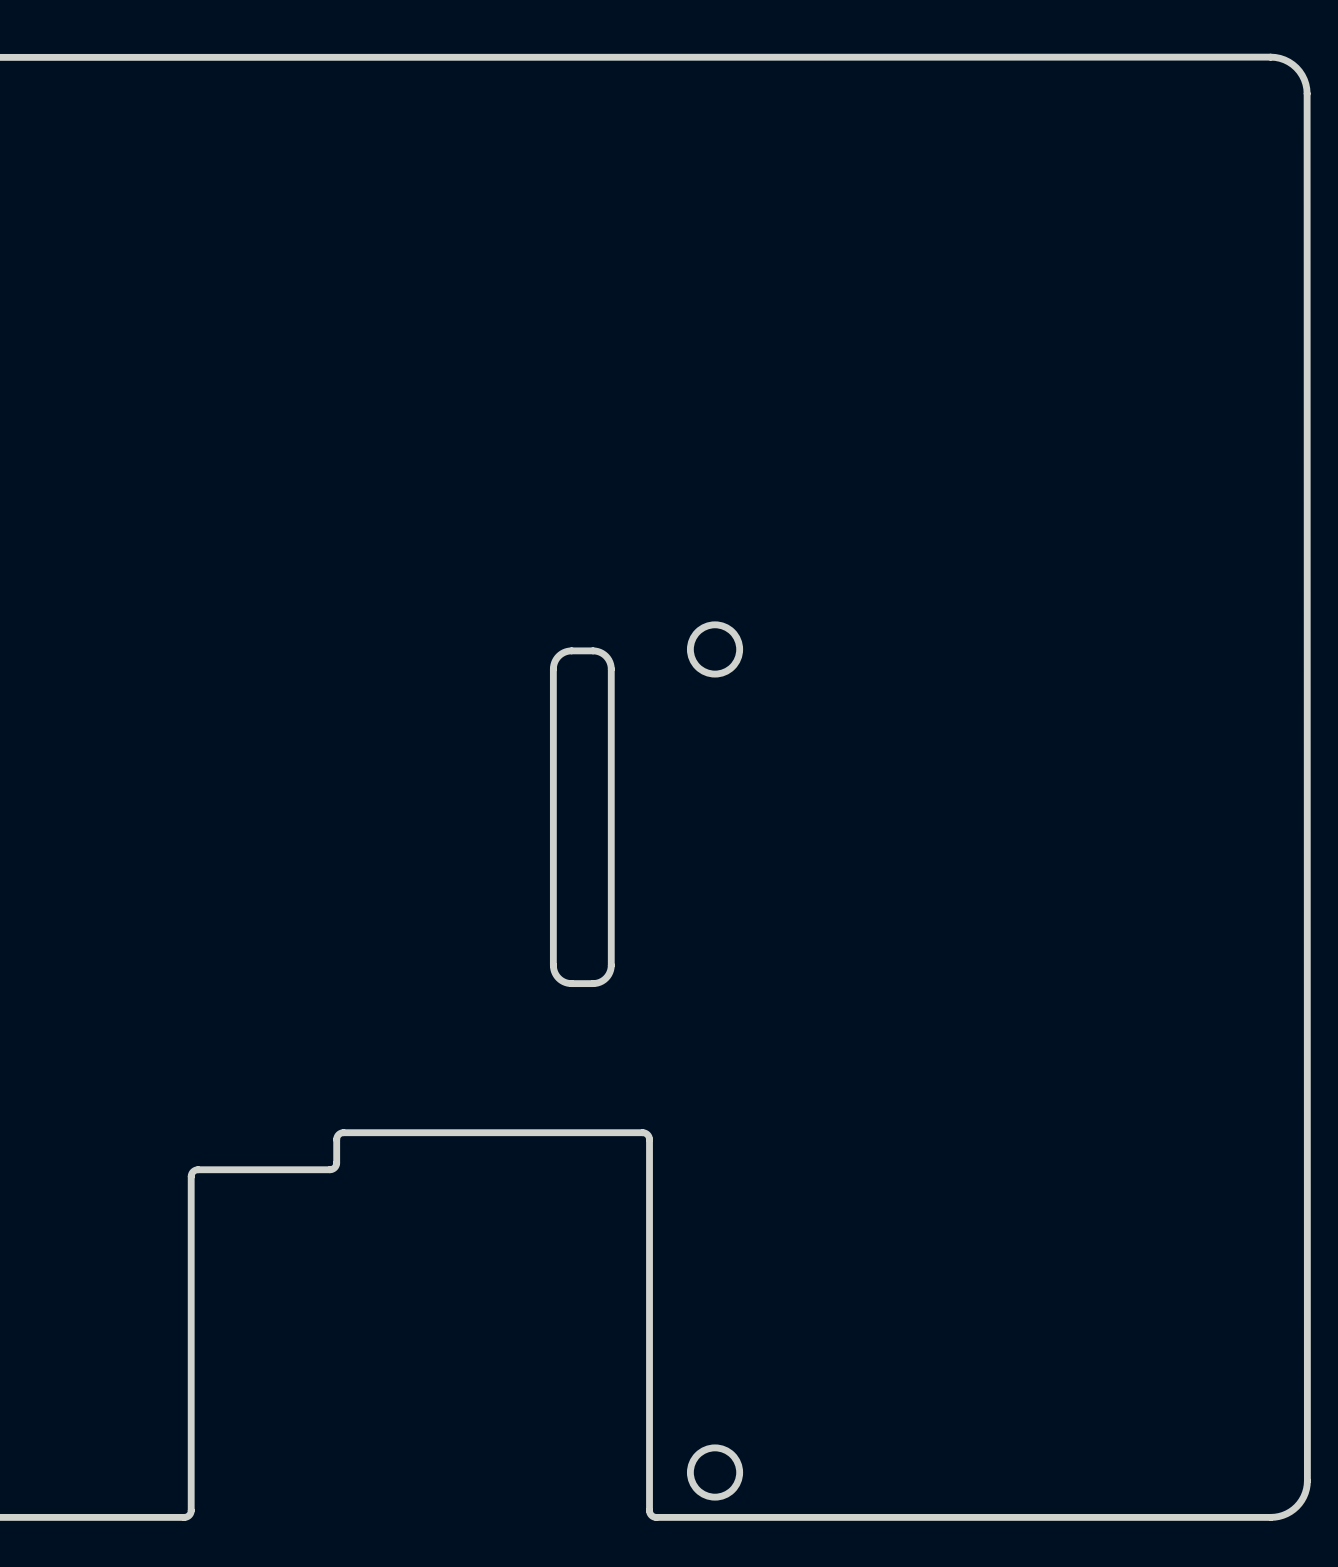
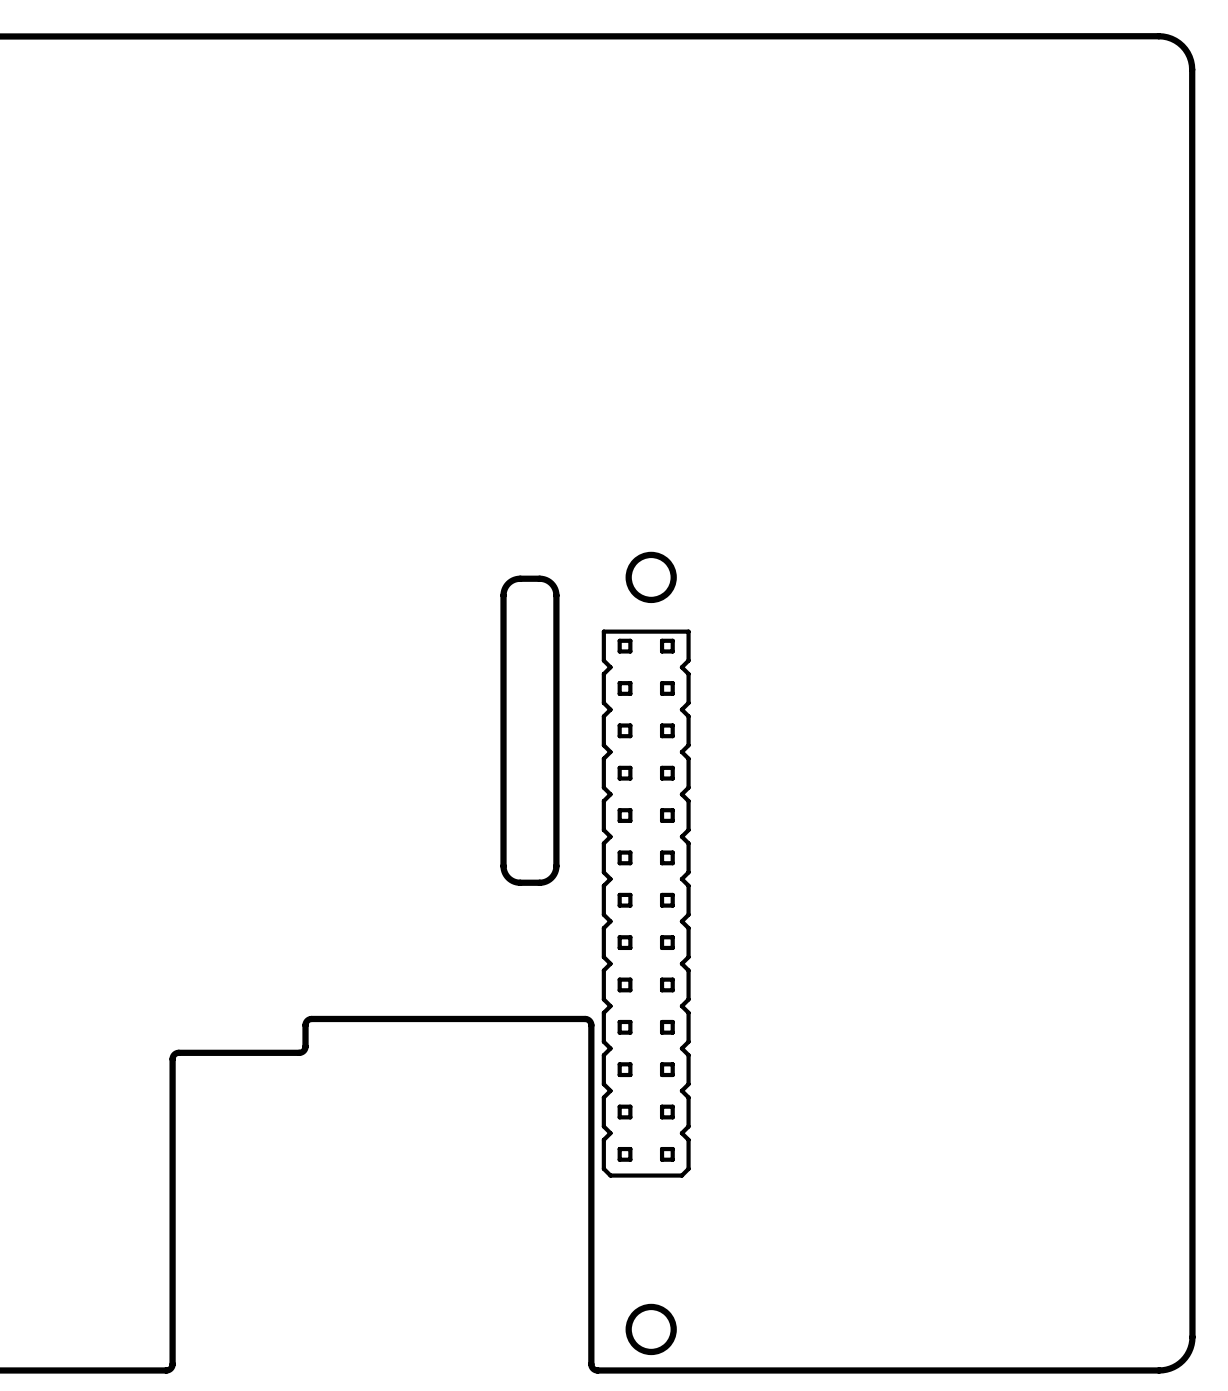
board edge: none -> (688, 631) (688, 660) (681, 667) (688, 673) (688, 702) (681, 709) (688, 716) (688, 745) (681, 752) (688, 758) (688, 787) (681, 794) (688, 801) (688, 830) (681, 836) (688, 843) (688, 872) (681, 879) (688, 885) (688, 914) (681, 921) (688, 928) (688, 957) (681, 963) (688, 970) (688, 999) (681, 1006) (688, 1012) (688, 1041) (681, 1048) (688, 1055) (688, 1084) (681, 1090) (688, 1097) (688, 1126) (681, 1133) (688, 1139) (688, 1168) (681, 1175) (610, 1175) (603, 1168) (603, 1139) (610, 1133) (603, 1126) (603, 1097) (610, 1090) (603, 1084) (603, 1055) (610, 1048) (603, 1041) (603, 1012) (610, 1006) (603, 999) (603, 970) (610, 963) (603, 957) (603, 928) (610, 921) (603, 914) (603, 885) (610, 879) (603, 872) (603, 843) (610, 836) (603, 830) (603, 801) (610, 794) (603, 787) (603, 758) (610, 752) (603, 745) (603, 716) (610, 709) (603, 702) (603, 673) (610, 667) (603, 660) (603, 631) (688, 631)
board edge: none -> (630, 640) (619, 640) (619, 651) (630, 651) (630, 640)
board edge: none -> (672, 640) (662, 640) (662, 651) (672, 651) (672, 640)
board edge: none -> (630, 683) (619, 683) (619, 693) (630, 693) (630, 683)
board edge: none -> (672, 683) (672, 693) (662, 693) (662, 683) (672, 683)
board edge: none -> (630, 725) (619, 725) (619, 736) (630, 736) (630, 725)
board edge: none -> (672, 725) (672, 736) (662, 736) (662, 725) (672, 725)
board edge: none -> (630, 767) (619, 767) (619, 778) (630, 778) (630, 767)
board edge: none -> (672, 767) (672, 778) (662, 778) (662, 767) (672, 767)
board edge: none -> (630, 810) (619, 810) (619, 820) (630, 820) (630, 810)
board edge: none -> (672, 810) (672, 820) (662, 820) (662, 810) (672, 810)
board edge: none -> (630, 852) (619, 852) (619, 863) (630, 863) (630, 852)
board edge: none -> (672, 852) (672, 863) (662, 863) (662, 852) (672, 852)
board edge: none -> (630, 894) (619, 894) (619, 905) (630, 905) (630, 894)
board edge: none -> (672, 894) (672, 905) (662, 905) (662, 894) (672, 894)
board edge: none -> (630, 937) (619, 937) (619, 947) (630, 947) (630, 937)
board edge: none -> (672, 937) (672, 947) (662, 947) (662, 937) (672, 937)
board edge: none -> (630, 979) (619, 979) (619, 990) (630, 990) (630, 979)
board edge: none -> (672, 979) (672, 990) (662, 990) (662, 979) (672, 979)
board edge: none -> (630, 1021) (619, 1021) (619, 1032) (630, 1032) (630, 1021)
board edge: none -> (672, 1021) (672, 1032) (662, 1032) (662, 1021) (672, 1021)
board edge: none -> (630, 1064) (619, 1064) (619, 1075) (630, 1075) (630, 1064)
board edge: none -> (672, 1064) (672, 1075) (662, 1075) (662, 1064) (672, 1064)
board edge: none -> (630, 1106) (619, 1106) (619, 1117) (630, 1117) (630, 1106)
board edge: none -> (672, 1106) (672, 1117) (662, 1117) (662, 1106) (672, 1106)
board edge: none -> (630, 1149) (619, 1149) (619, 1159) (630, 1159) (630, 1149)
board edge: none -> (672, 1149) (672, 1159) (662, 1159) (662, 1149) (672, 1149)

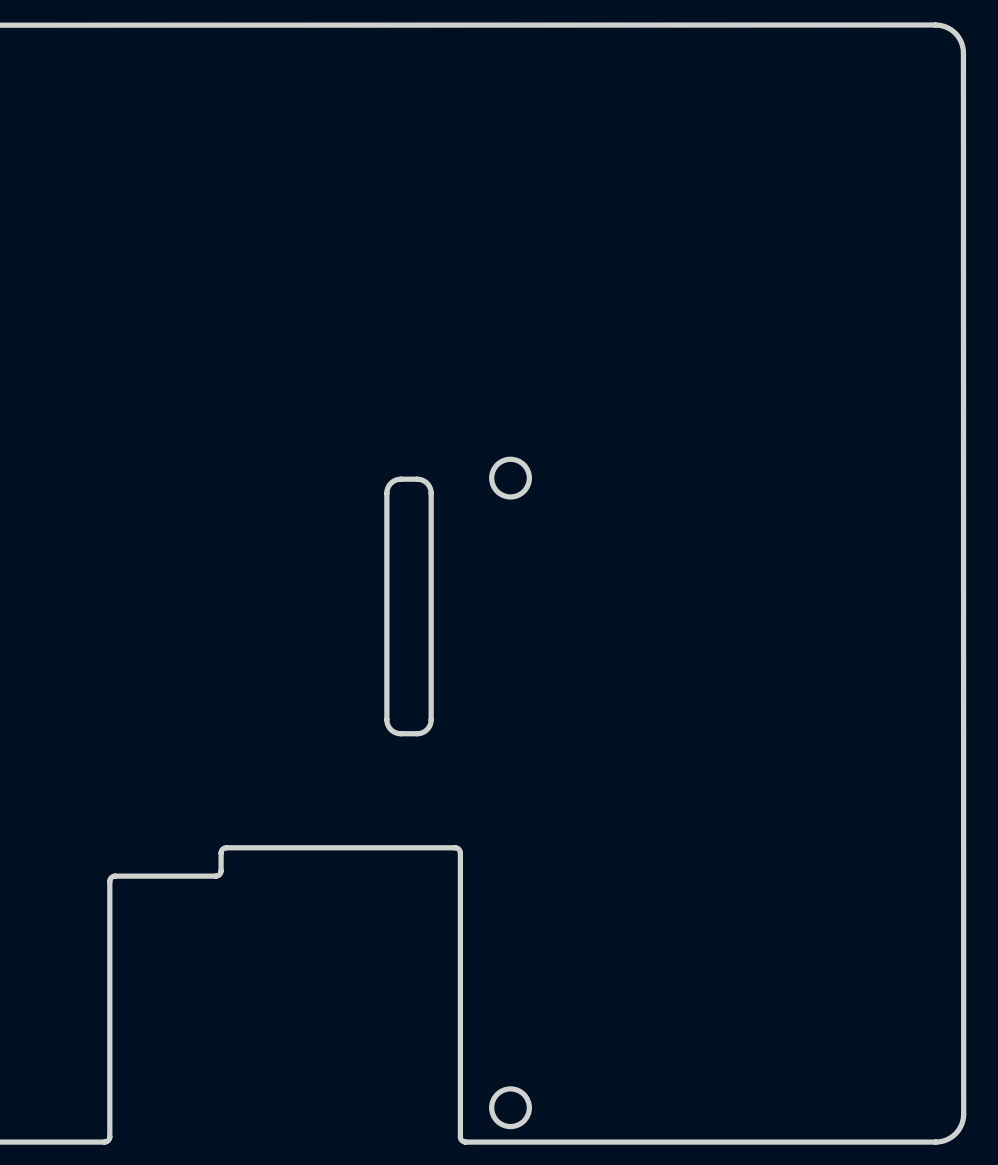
board edge: (688, 631) (688, 660) (681, 667) (688, 673) (688, 702) (681, 709) (688, 716) (688, 745) (681, 752) (688, 758) (688, 787) (681, 794) (688, 801) (688, 830) (681, 836) (688, 843) (688, 872) (681, 879) (688, 885) (688, 914) (681, 921) (688, 928) (688, 957) (681, 963) (688, 970) (688, 999) (681, 1006) (688, 1012) (688, 1041) (681, 1048) (688, 1055) (688, 1084) (681, 1090) (688, 1097) (688, 1126) (681, 1133) (688, 1139) (688, 1168) (681, 1175) (610, 1175) (603, 1168) (603, 1139) (610, 1133) (603, 1126) (603, 1097) (610, 1090) (603, 1084) (603, 1055) (610, 1048) (603, 1041) (603, 1012) (610, 1006) (603, 999) (603, 970) (610, 963) (603, 957) (603, 928) (610, 921) (603, 914) (603, 885) (610, 879) (603, 872) (603, 843) (610, 836) (603, 830) (603, 801) (610, 794) (603, 787) (603, 758) (610, 752) (603, 745) (603, 716) (610, 709) (603, 702) (603, 673) (610, 667) (603, 660) (603, 631) (688, 631) -> none
board edge: (630, 640) (619, 640) (619, 651) (630, 651) (630, 640) -> none
board edge: (672, 640) (662, 640) (662, 651) (672, 651) (672, 640) -> none
board edge: (630, 683) (619, 683) (619, 693) (630, 693) (630, 683) -> none
board edge: (672, 683) (672, 693) (662, 693) (662, 683) (672, 683) -> none
board edge: (630, 725) (619, 725) (619, 736) (630, 736) (630, 725) -> none
board edge: (672, 725) (672, 736) (662, 736) (662, 725) (672, 725) -> none
board edge: (630, 767) (619, 767) (619, 778) (630, 778) (630, 767) -> none
board edge: (672, 767) (672, 778) (662, 778) (662, 767) (672, 767) -> none
board edge: (630, 810) (619, 810) (619, 820) (630, 820) (630, 810) -> none
board edge: (672, 810) (672, 820) (662, 820) (662, 810) (672, 810) -> none
board edge: (630, 852) (619, 852) (619, 863) (630, 863) (630, 852) -> none
board edge: (672, 852) (672, 863) (662, 863) (662, 852) (672, 852) -> none
board edge: (630, 894) (619, 894) (619, 905) (630, 905) (630, 894) -> none
board edge: (672, 894) (672, 905) (662, 905) (662, 894) (672, 894) -> none
board edge: (630, 937) (619, 937) (619, 947) (630, 947) (630, 937) -> none
board edge: (672, 937) (672, 947) (662, 947) (662, 937) (672, 937) -> none
board edge: (630, 979) (619, 979) (619, 990) (630, 990) (630, 979) -> none
board edge: (672, 979) (672, 990) (662, 990) (662, 979) (672, 979) -> none
board edge: (630, 1021) (619, 1021) (619, 1032) (630, 1032) (630, 1021) -> none
board edge: (672, 1021) (672, 1032) (662, 1032) (662, 1021) (672, 1021) -> none
board edge: (630, 1064) (619, 1064) (619, 1075) (630, 1075) (630, 1064) -> none
board edge: (672, 1064) (672, 1075) (662, 1075) (662, 1064) (672, 1064) -> none
board edge: (630, 1106) (619, 1106) (619, 1117) (630, 1117) (630, 1106) -> none
board edge: (672, 1106) (672, 1117) (662, 1117) (662, 1106) (672, 1106) -> none
board edge: (630, 1149) (619, 1149) (619, 1159) (630, 1159) (630, 1149) -> none
board edge: (672, 1149) (672, 1159) (662, 1159) (662, 1149) (672, 1149) -> none

